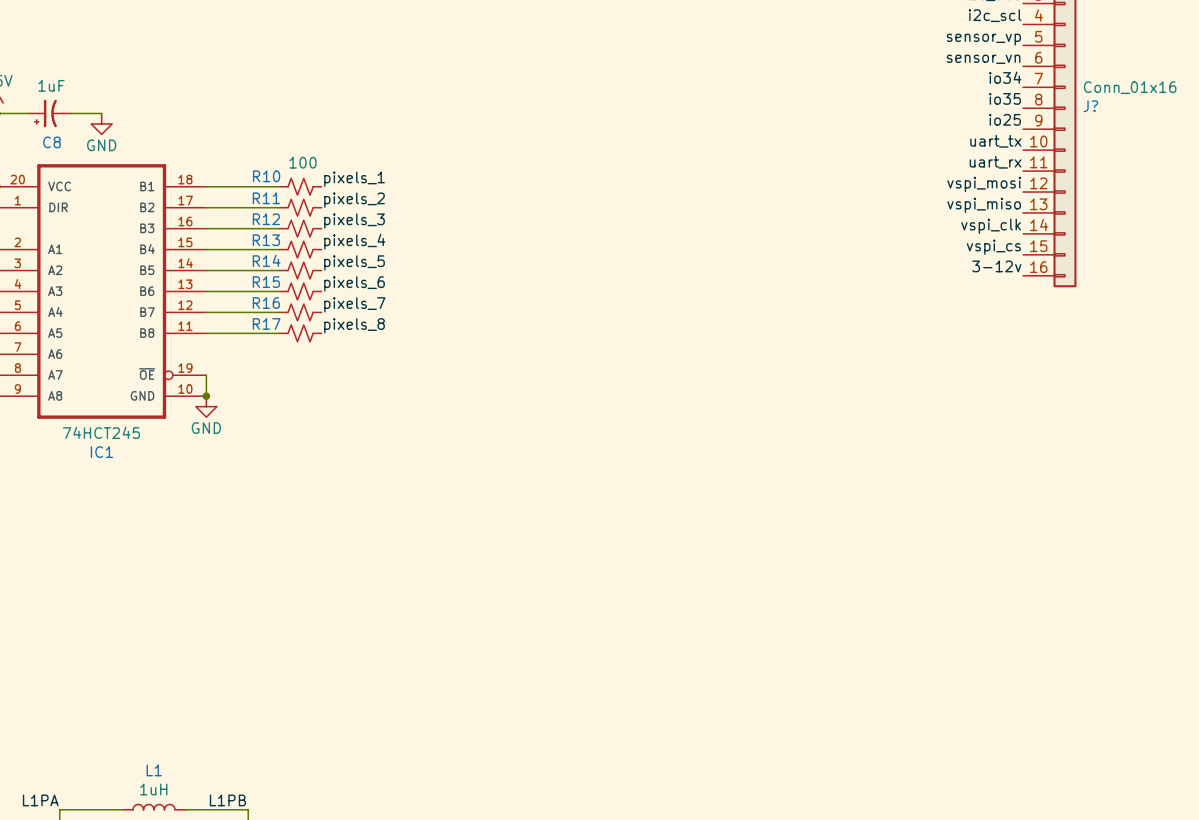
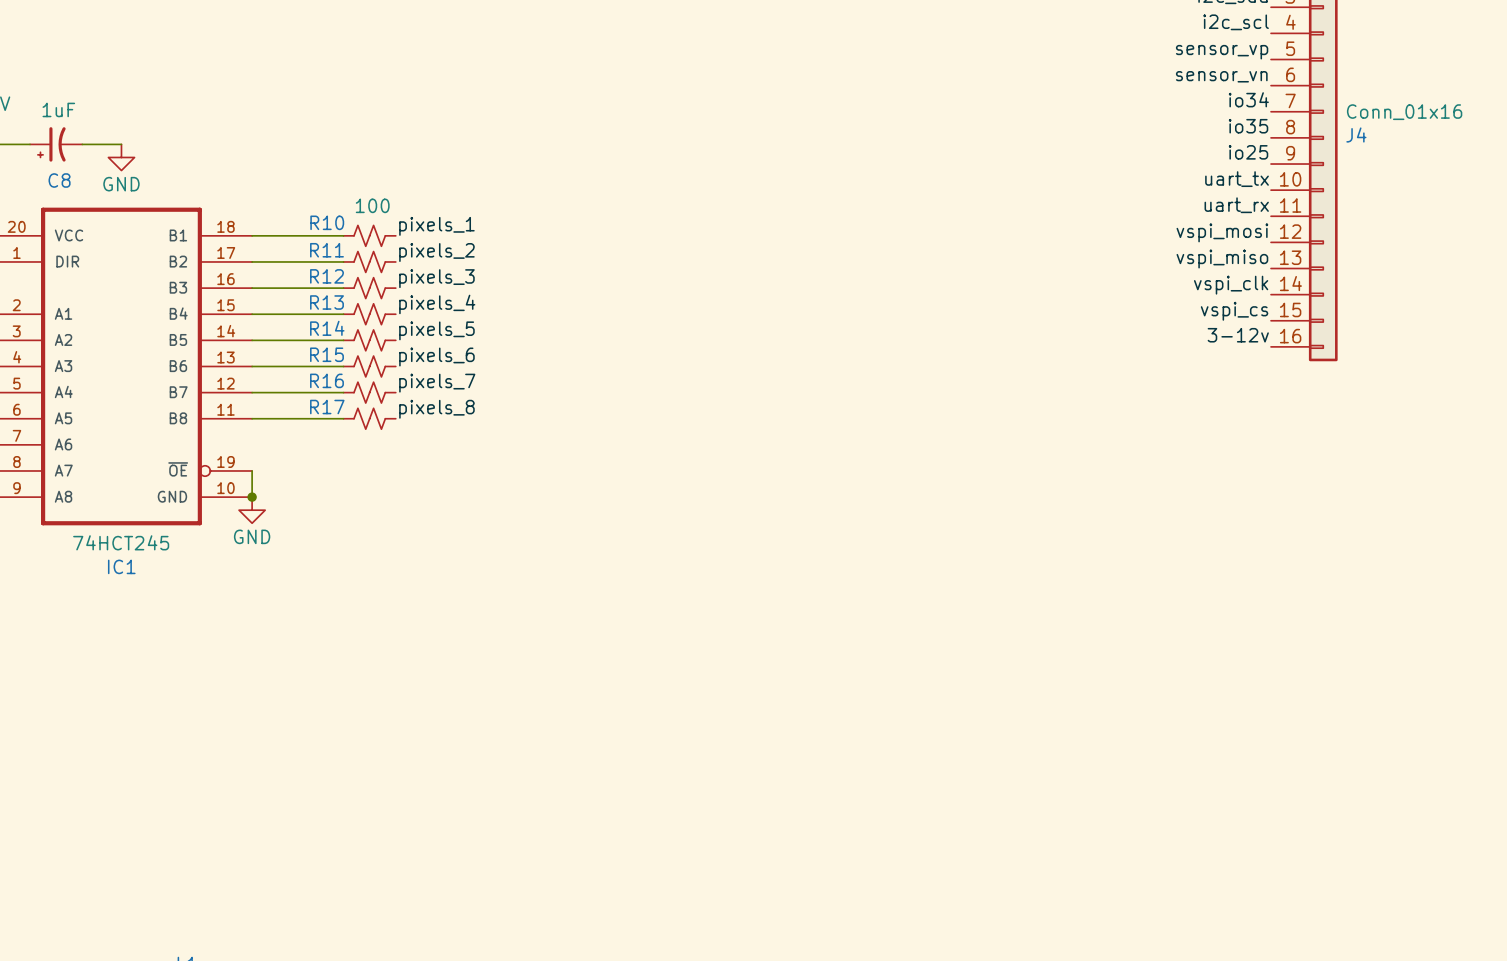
J? name: J? (1090, 106) -> J4 (1356, 134)

